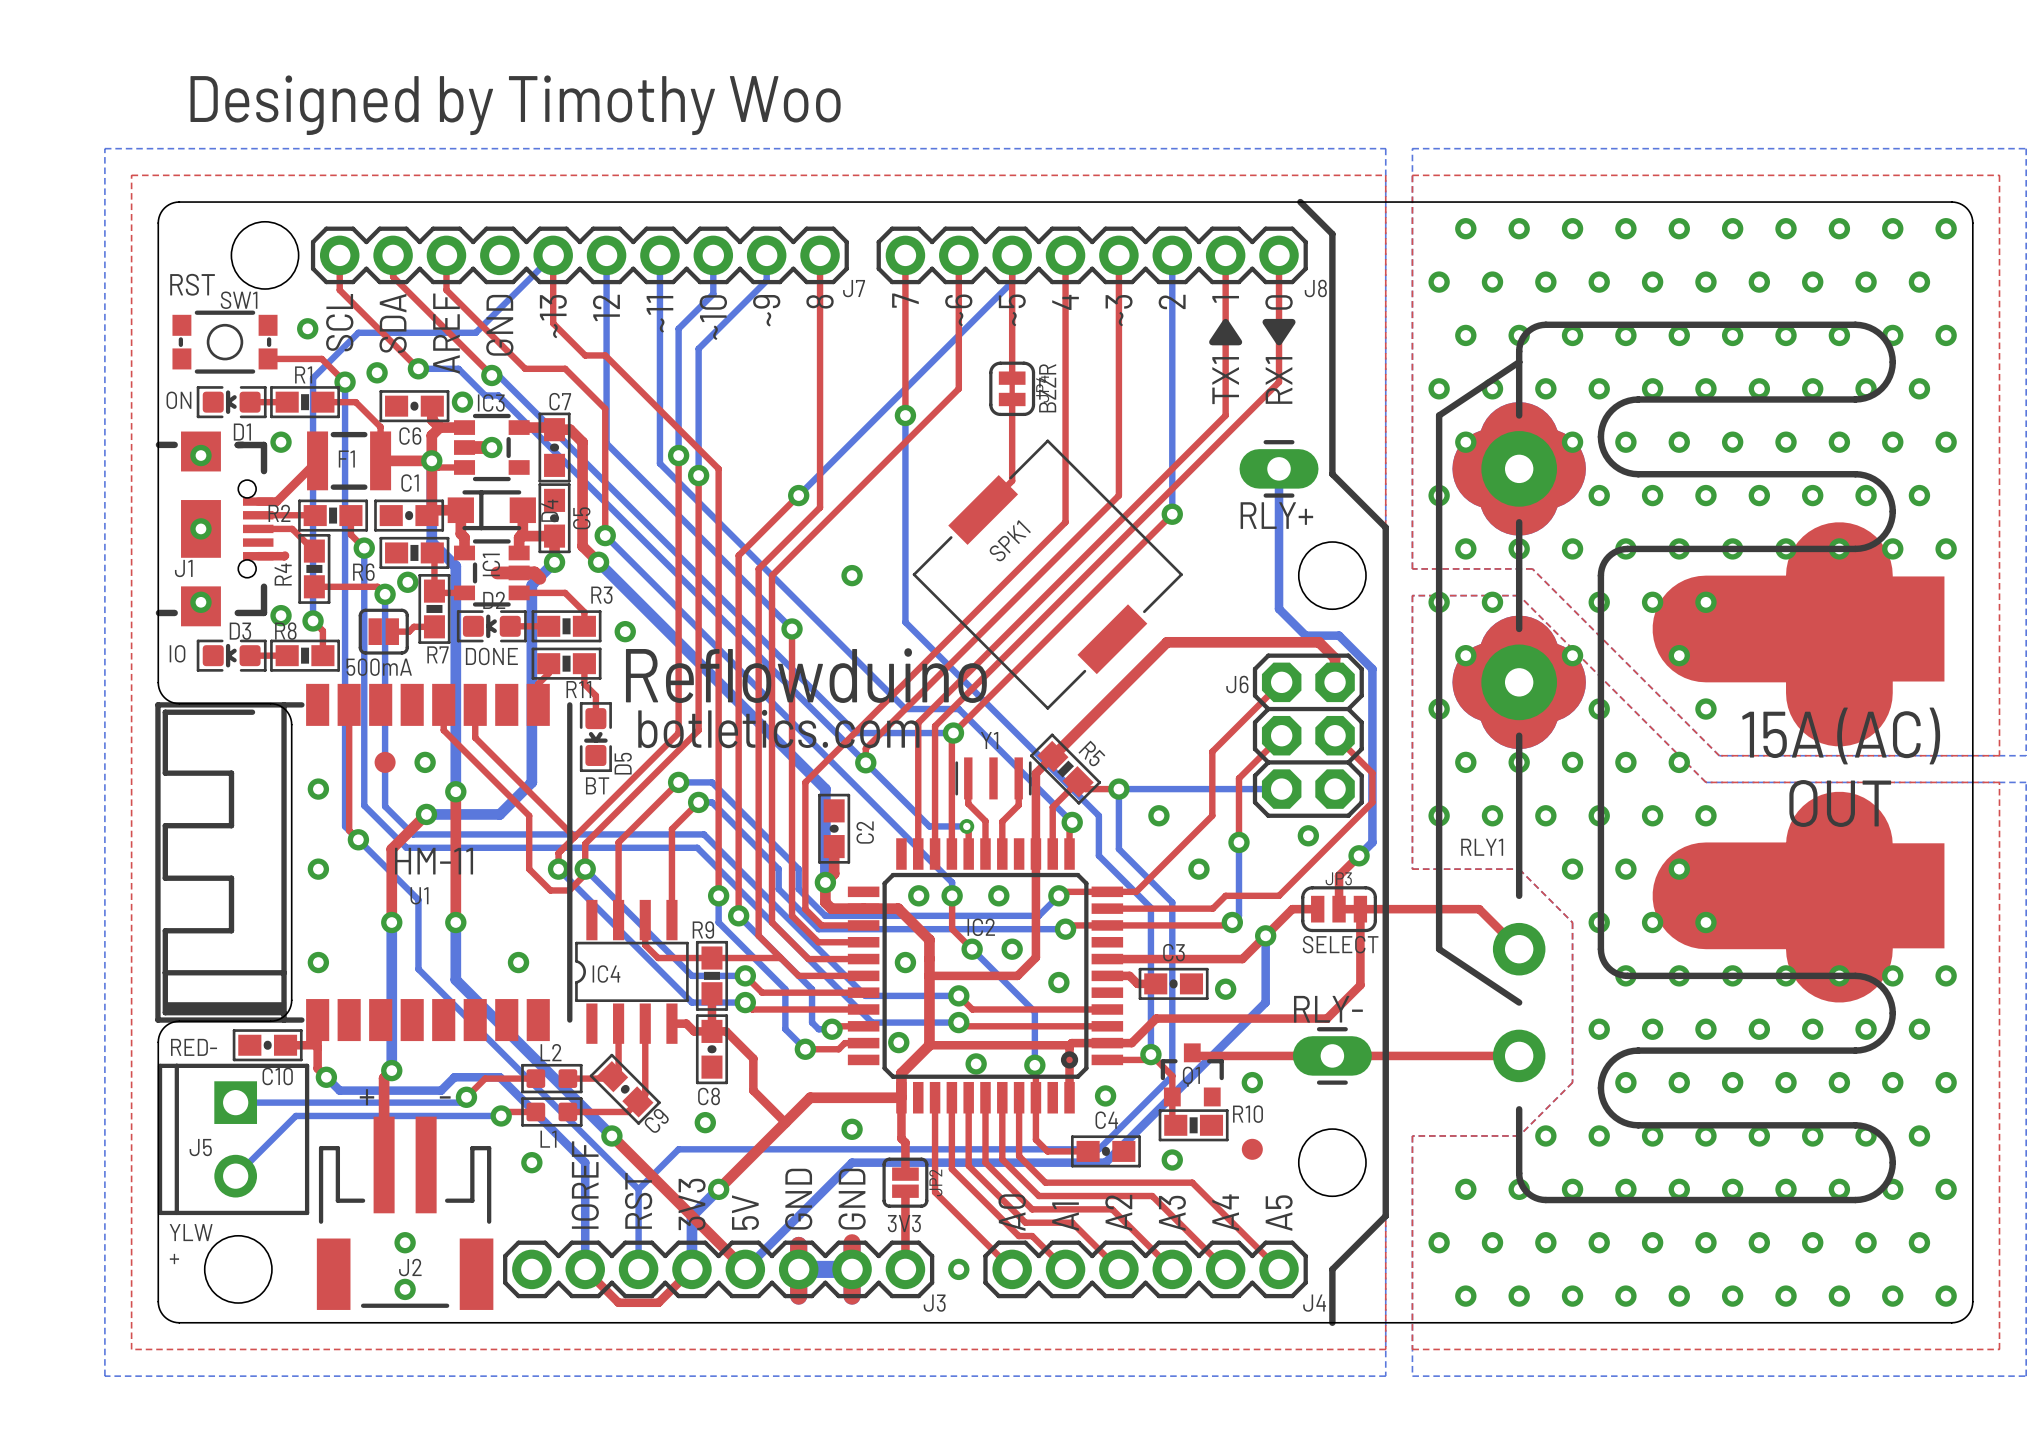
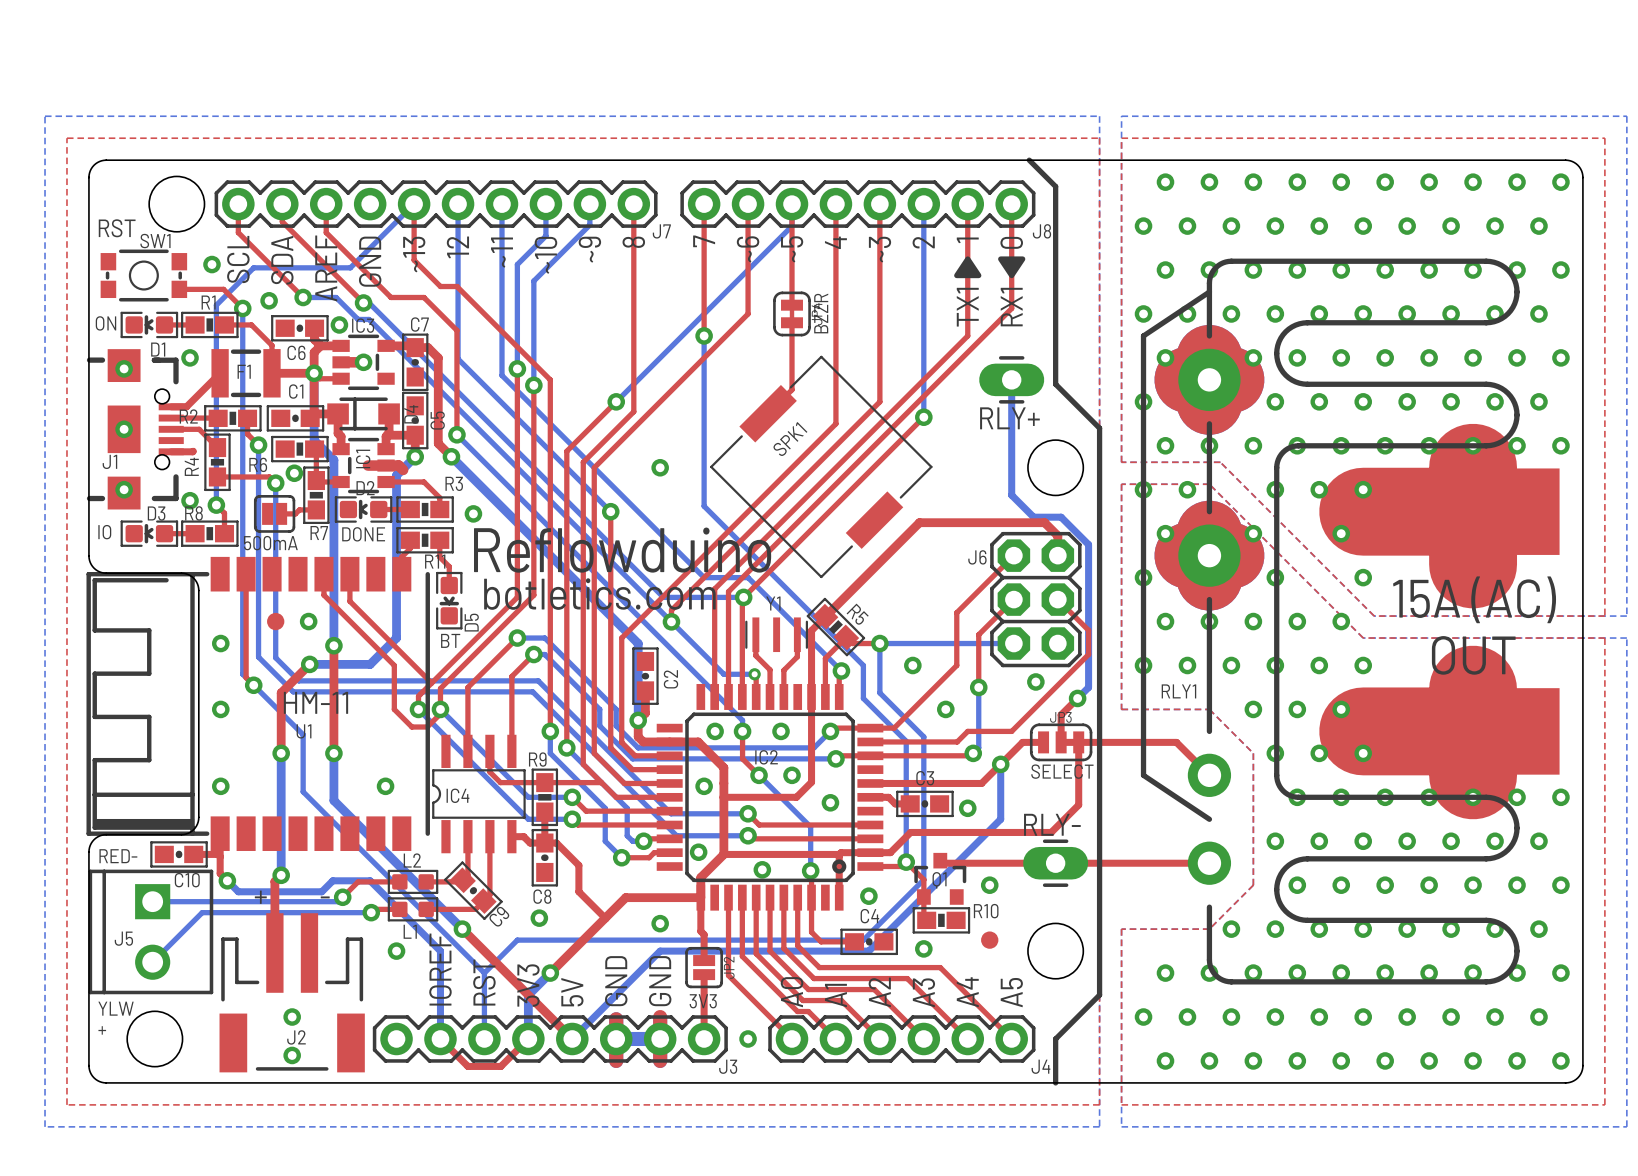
text: Designed by Timothy Woo (515, 105) -> none

